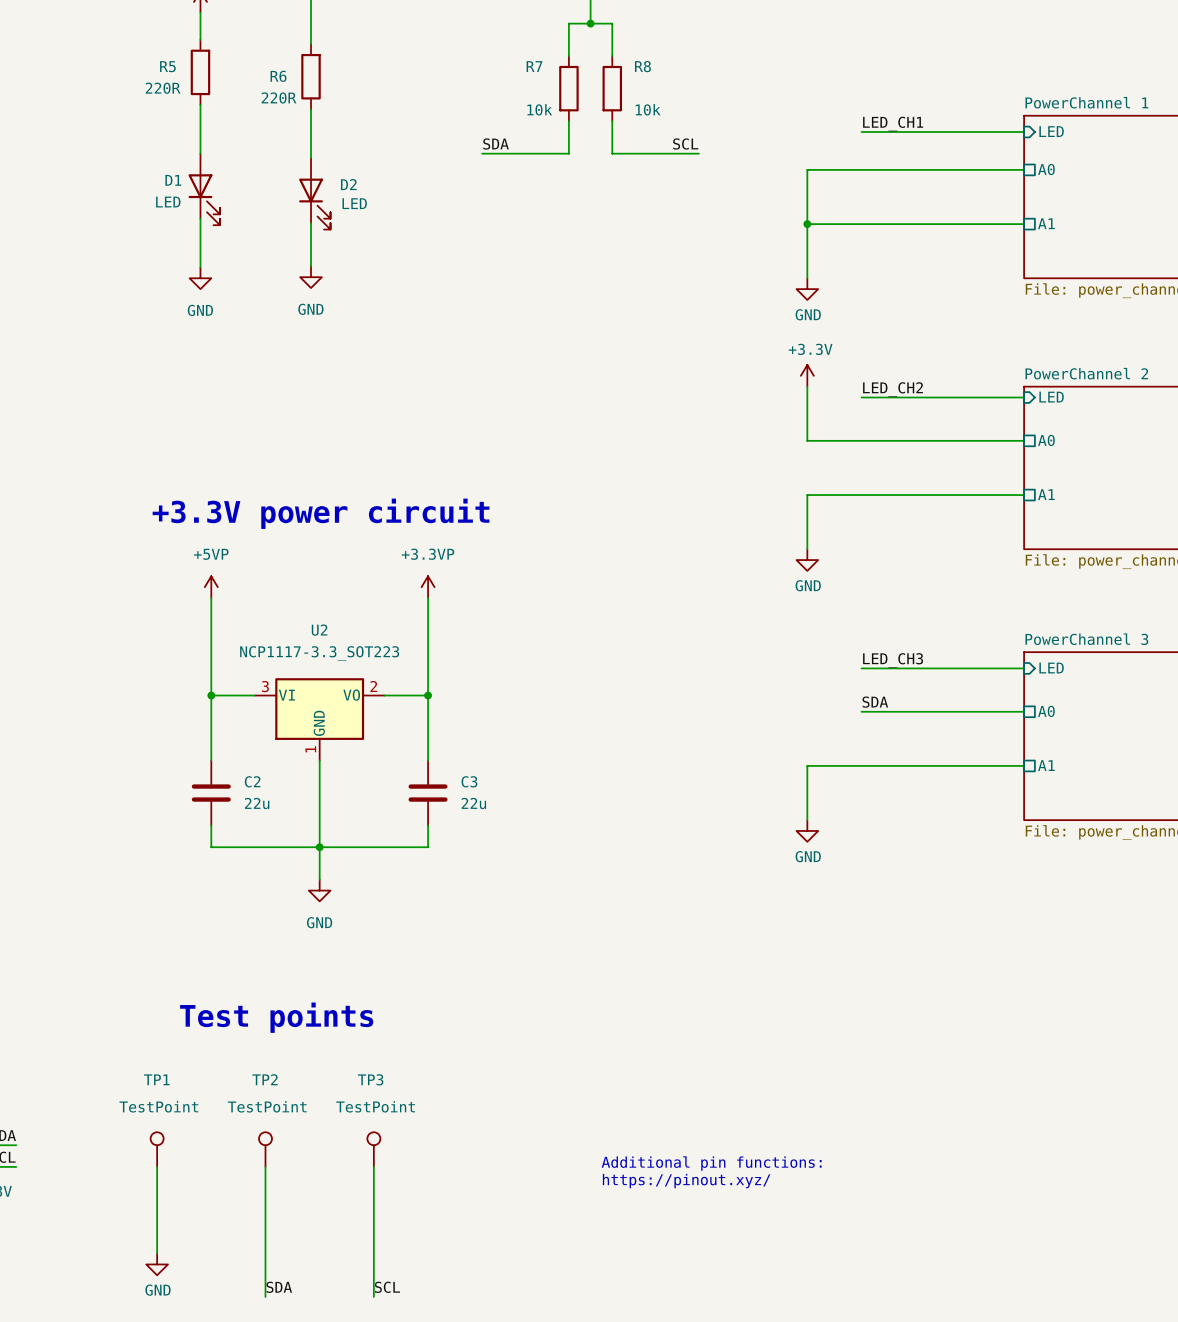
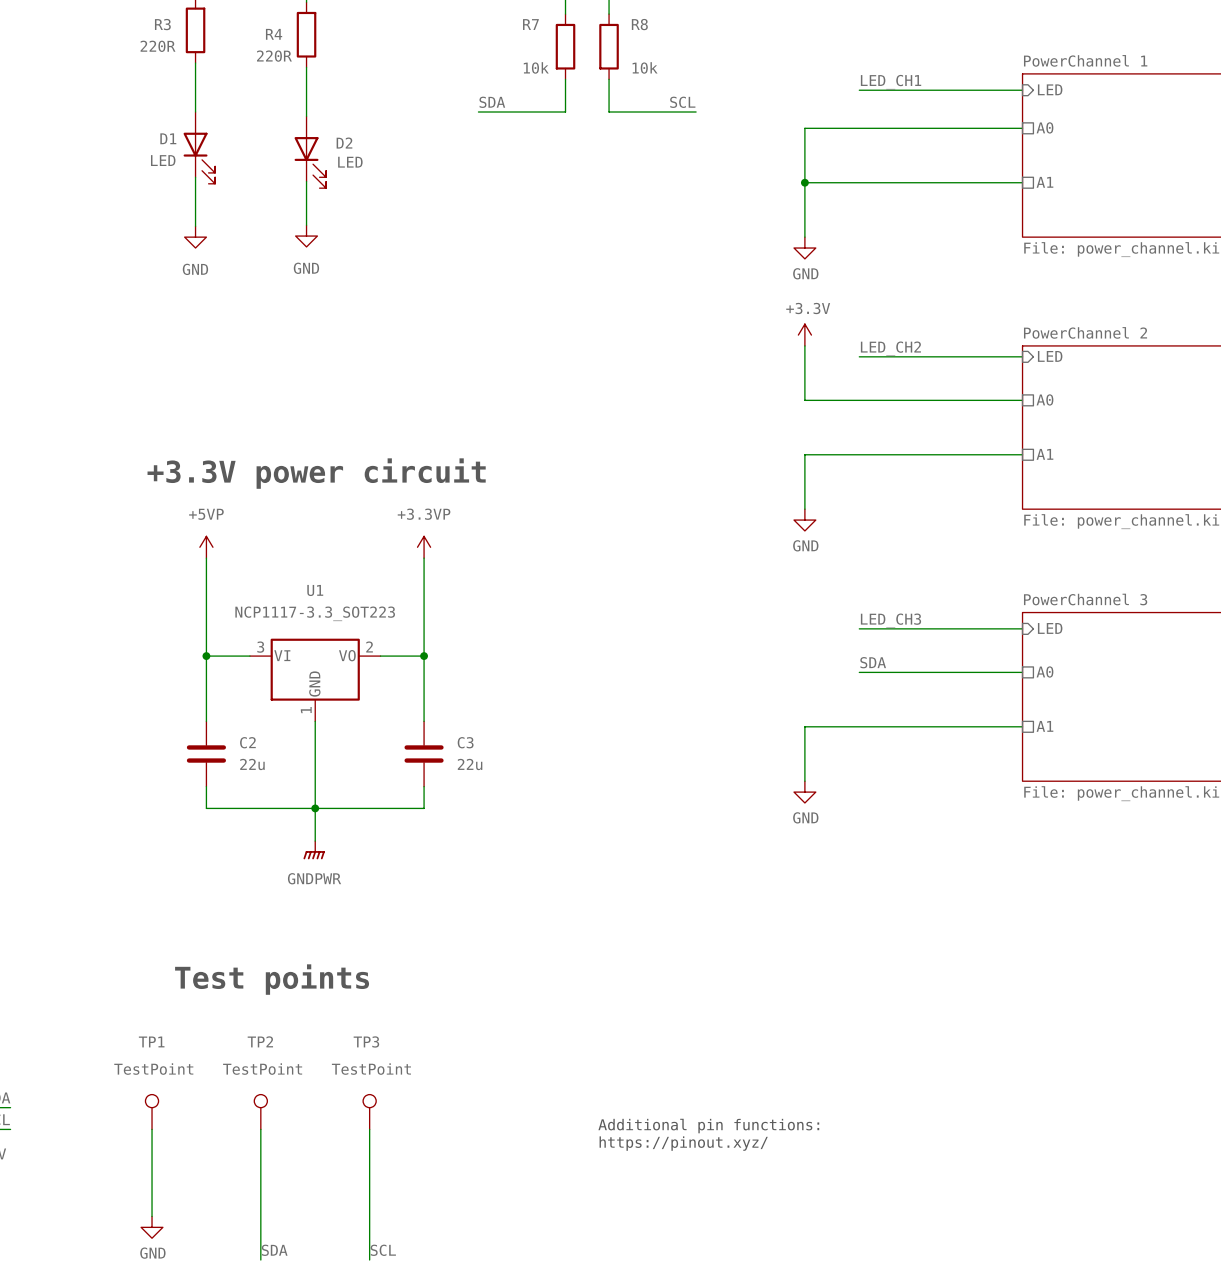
R5 name: R5 (167, 66) -> R3 (162, 24)
R6 name: R6 (278, 76) -> R4 (274, 34)
U2 name: U2 (319, 630) -> U1 (315, 590)
power symbol: GND (319, 890) -> GNDPWR (314, 850)

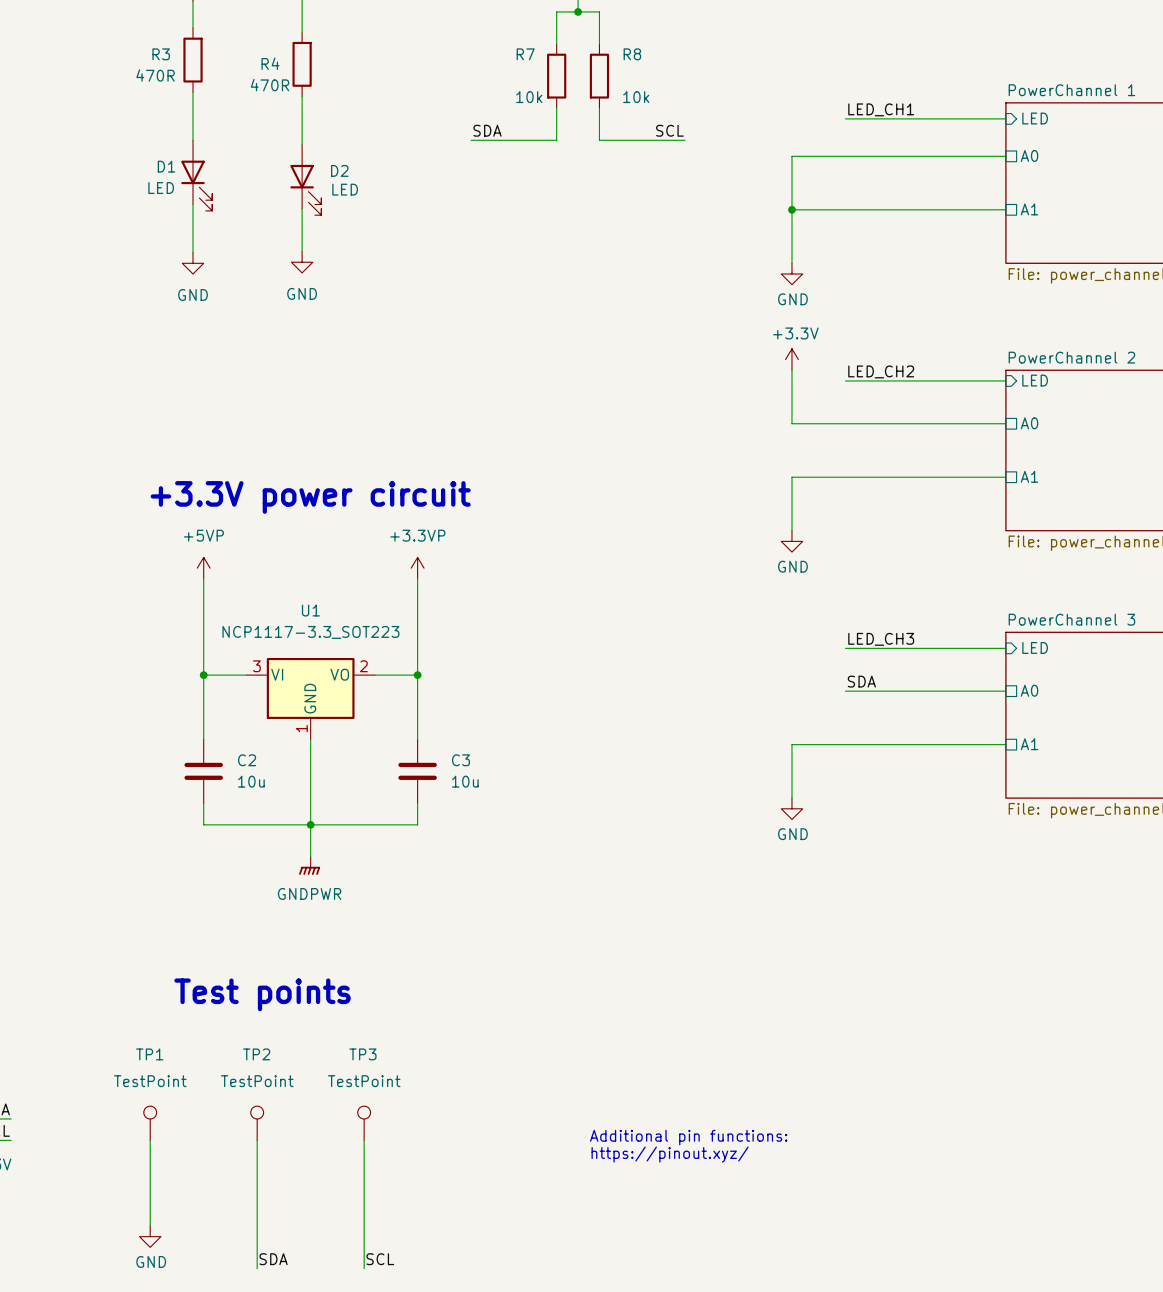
R3 value: 220R (158, 46) -> 470R (155, 75)
R4 value: 220R (274, 56) -> 470R (270, 85)
C2 value: 22u (252, 764) -> 10u (251, 781)
C3 value: 22u (470, 764) -> 10u (465, 781)

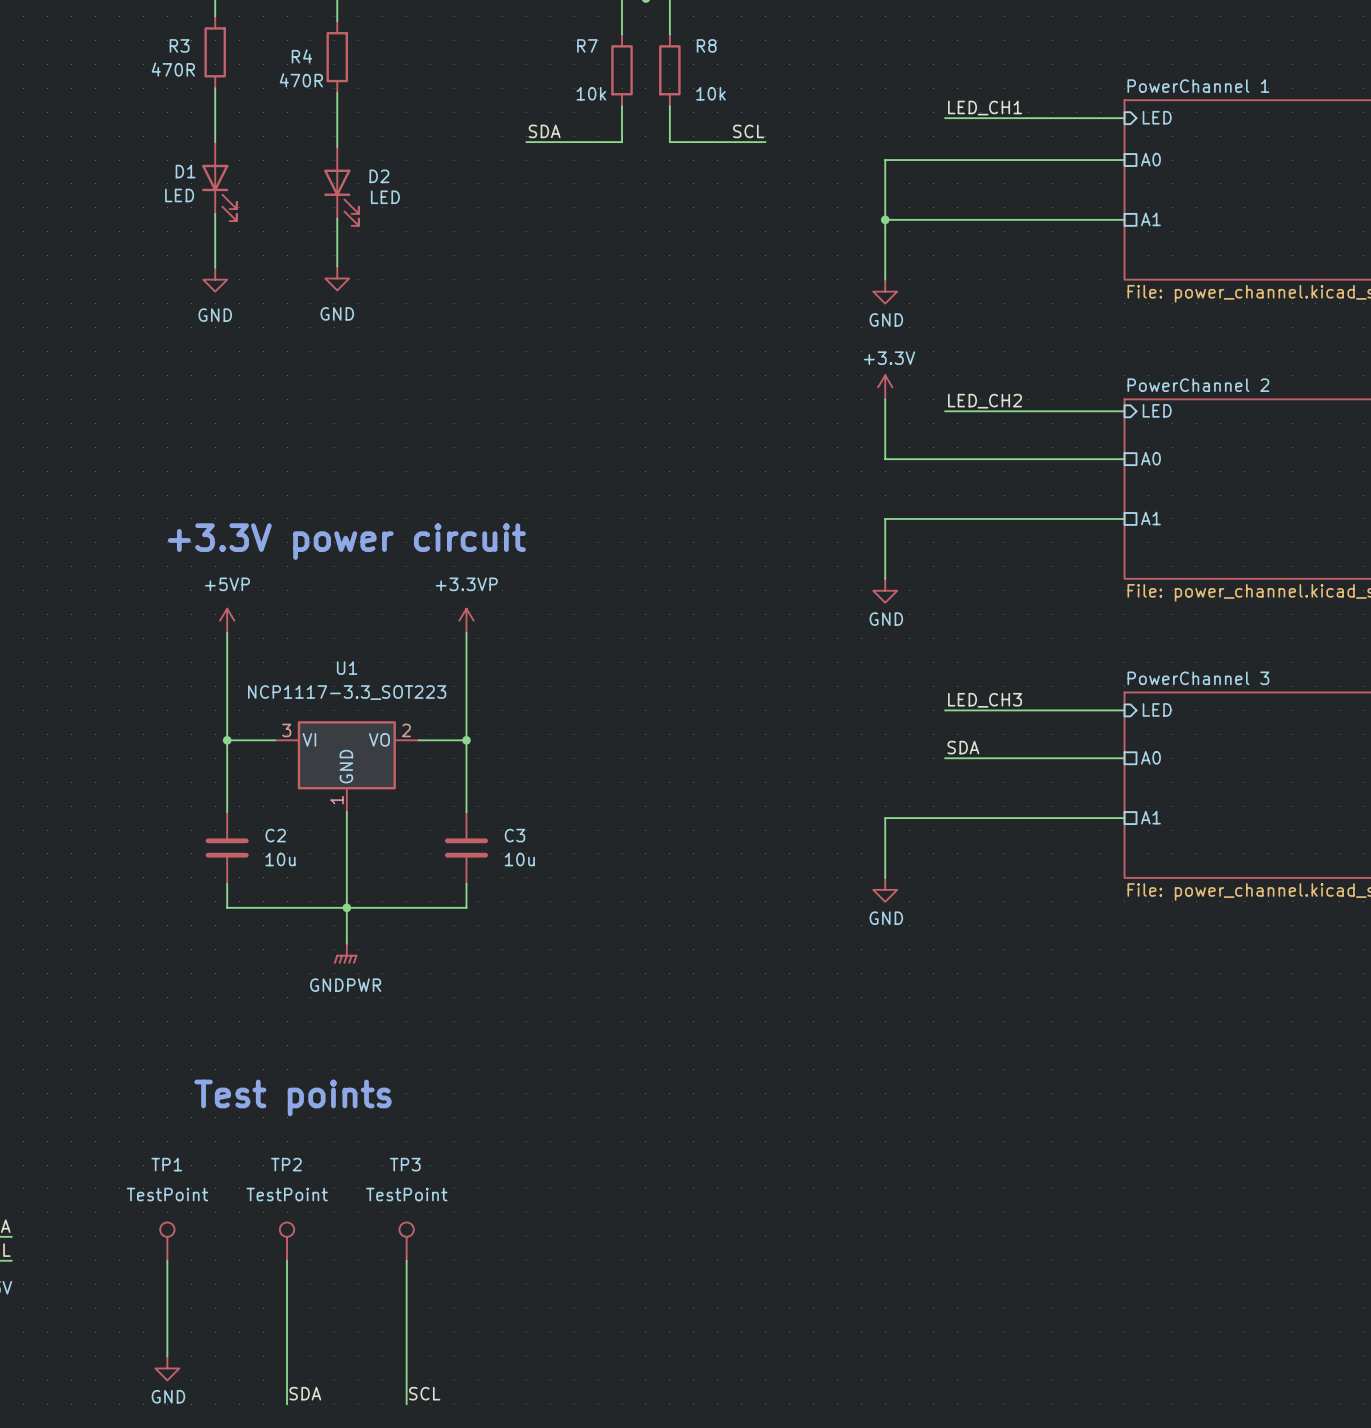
text: Additional pin functions: (688, 1137) -> none
text: https://pinout.xyz/ (670, 1154) -> none

